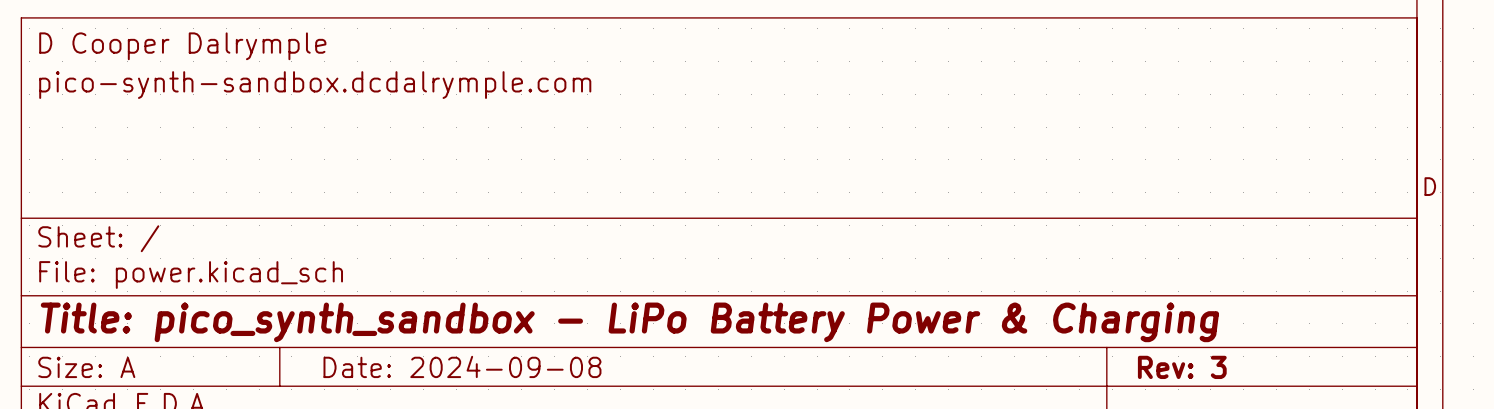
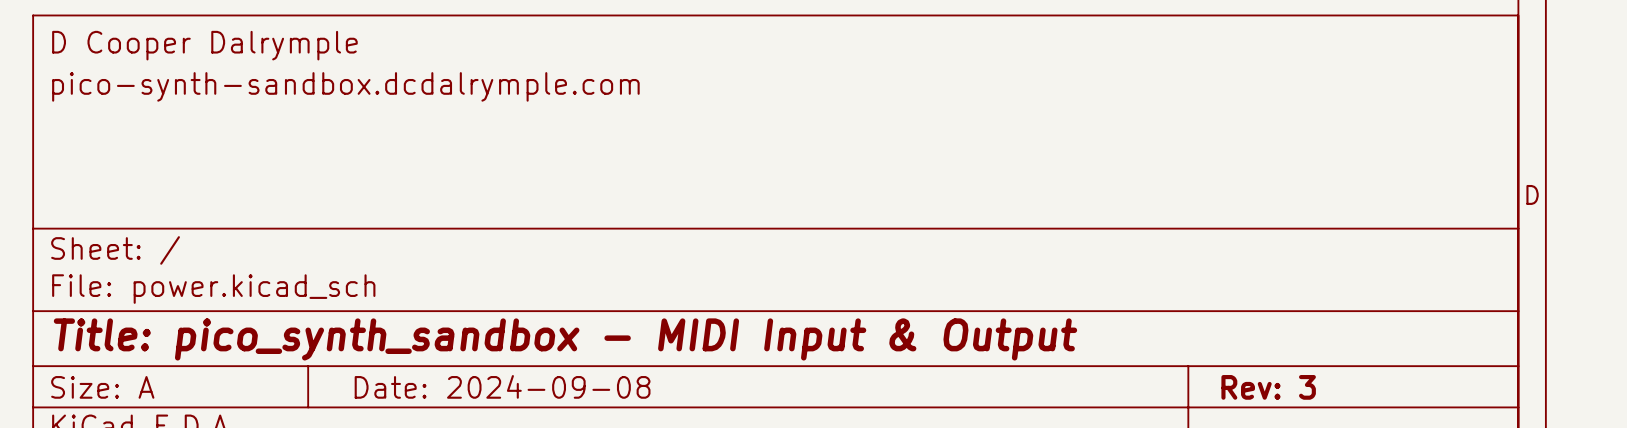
title block: Title: pico_synth_sandbox - LiPo Battery Power & Charging (629, 322) -> Title: pico_synth_sandbox - MIDI Input & Output (565, 339)

